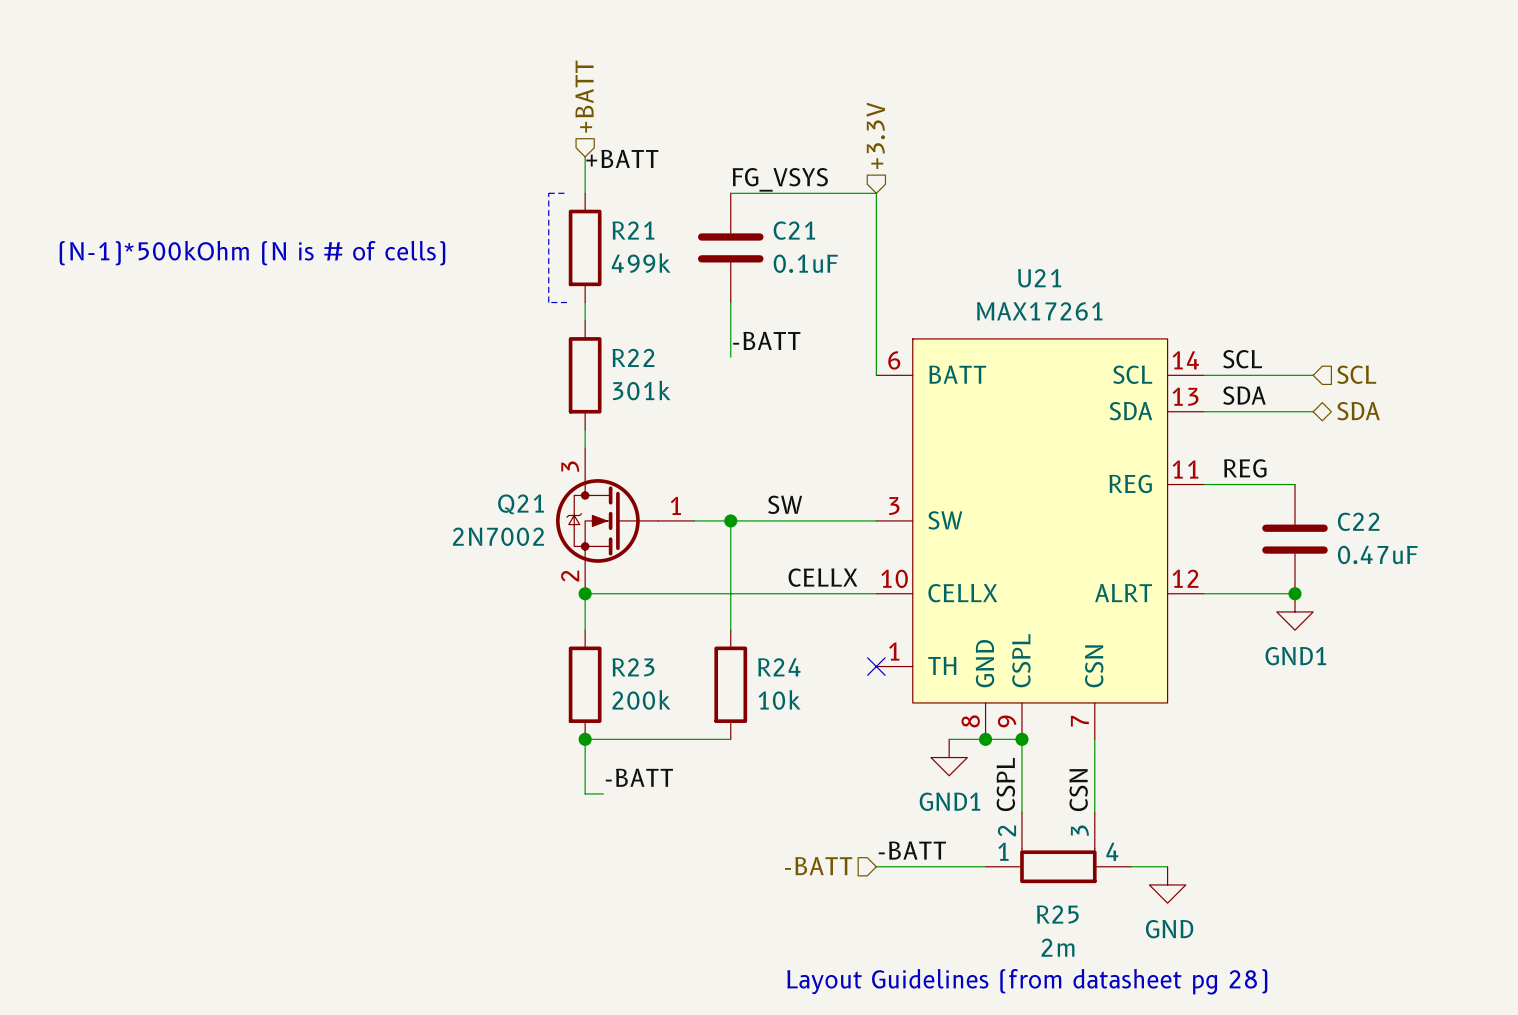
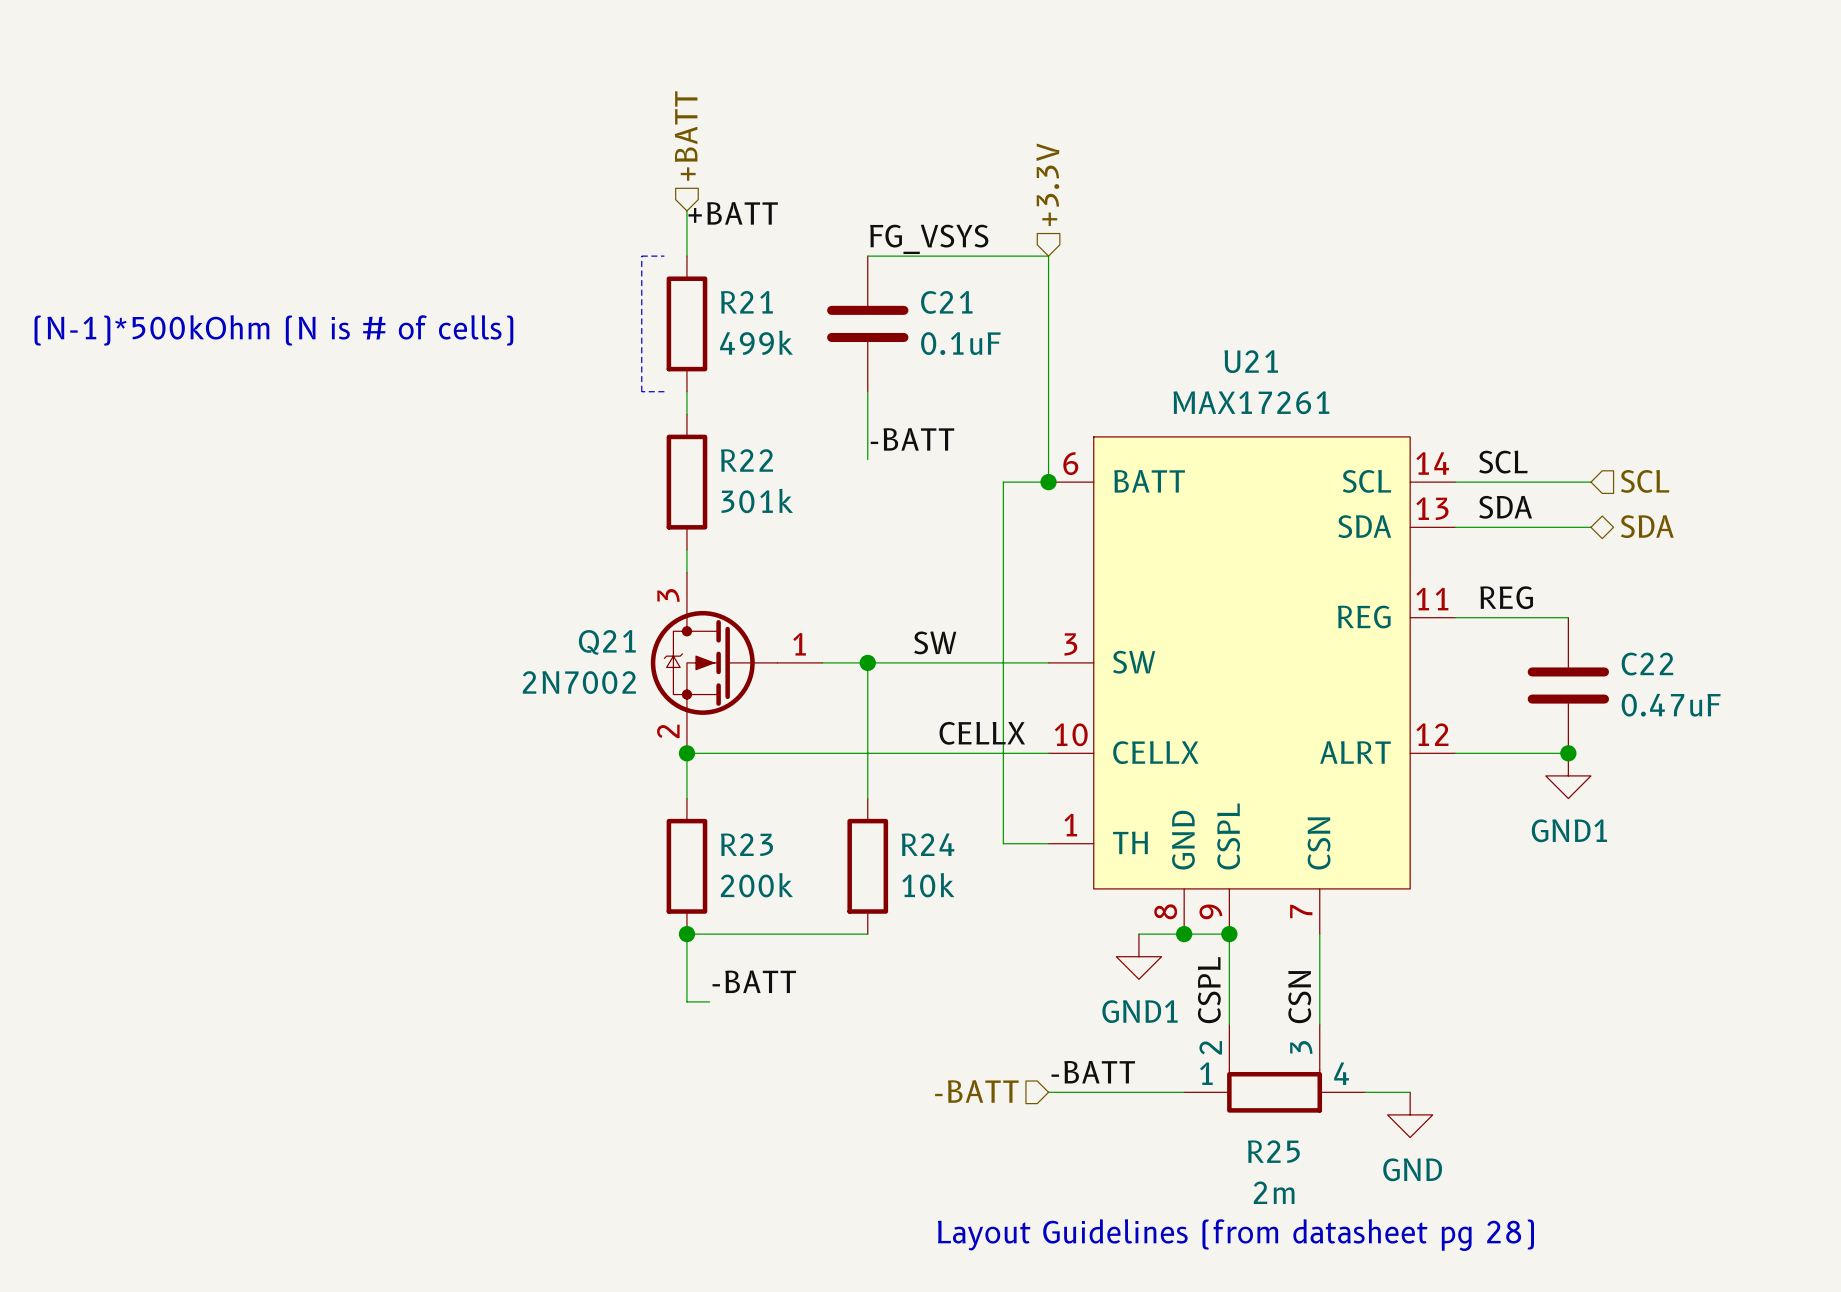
wire: none -> (1048, 482) (1003, 482) (1003, 843) (1048, 843)
junction: none -> (1048, 482)
no-connect mark: (876, 666) -> none

